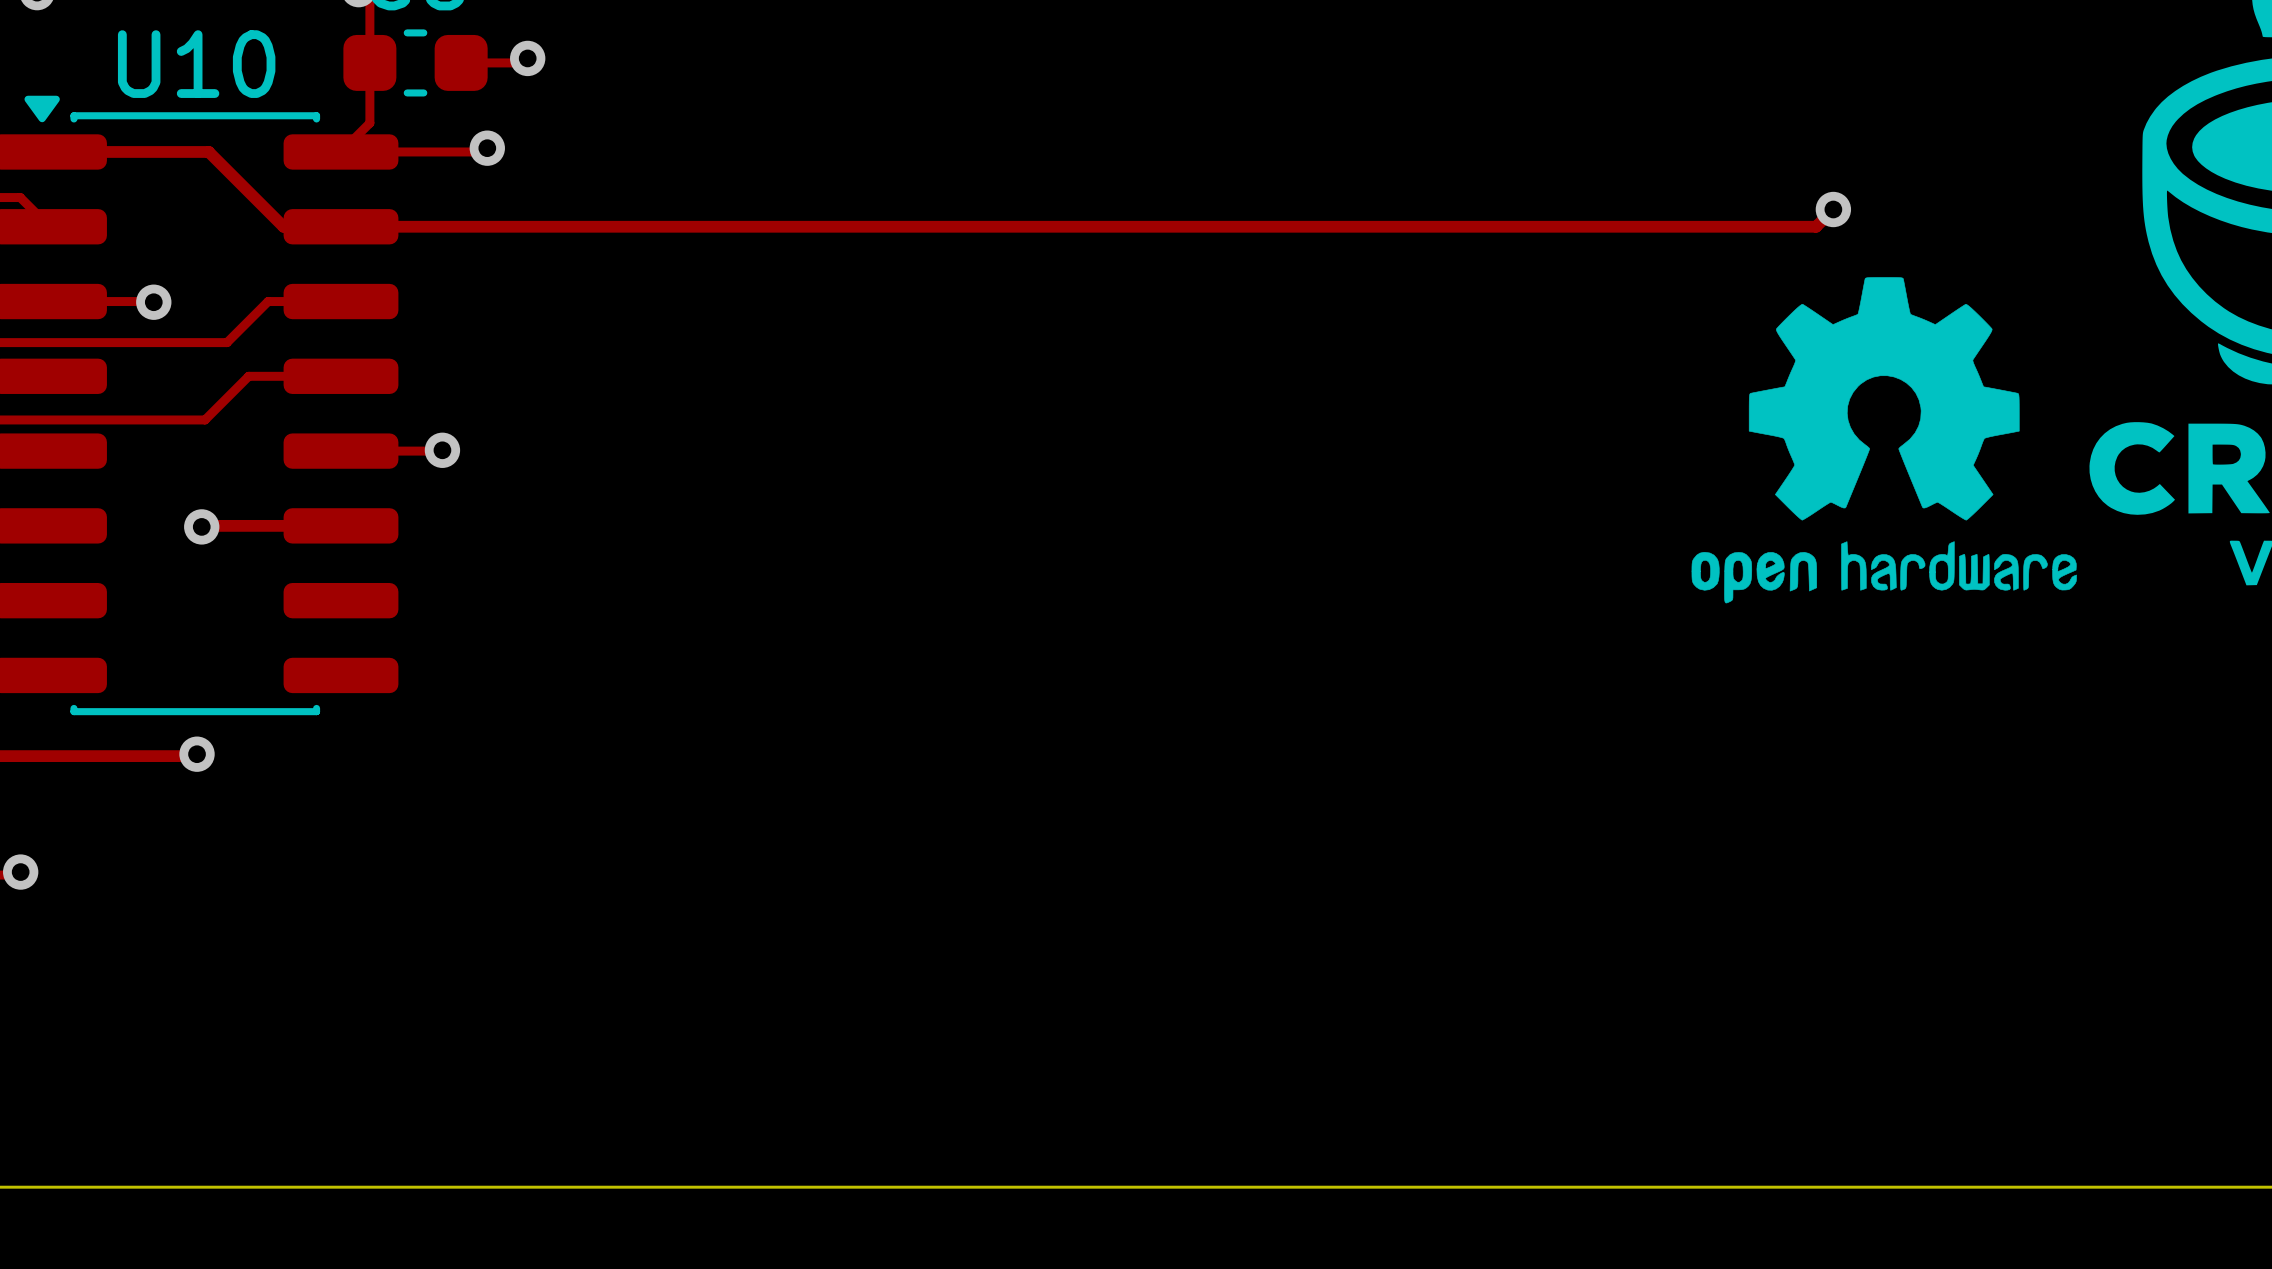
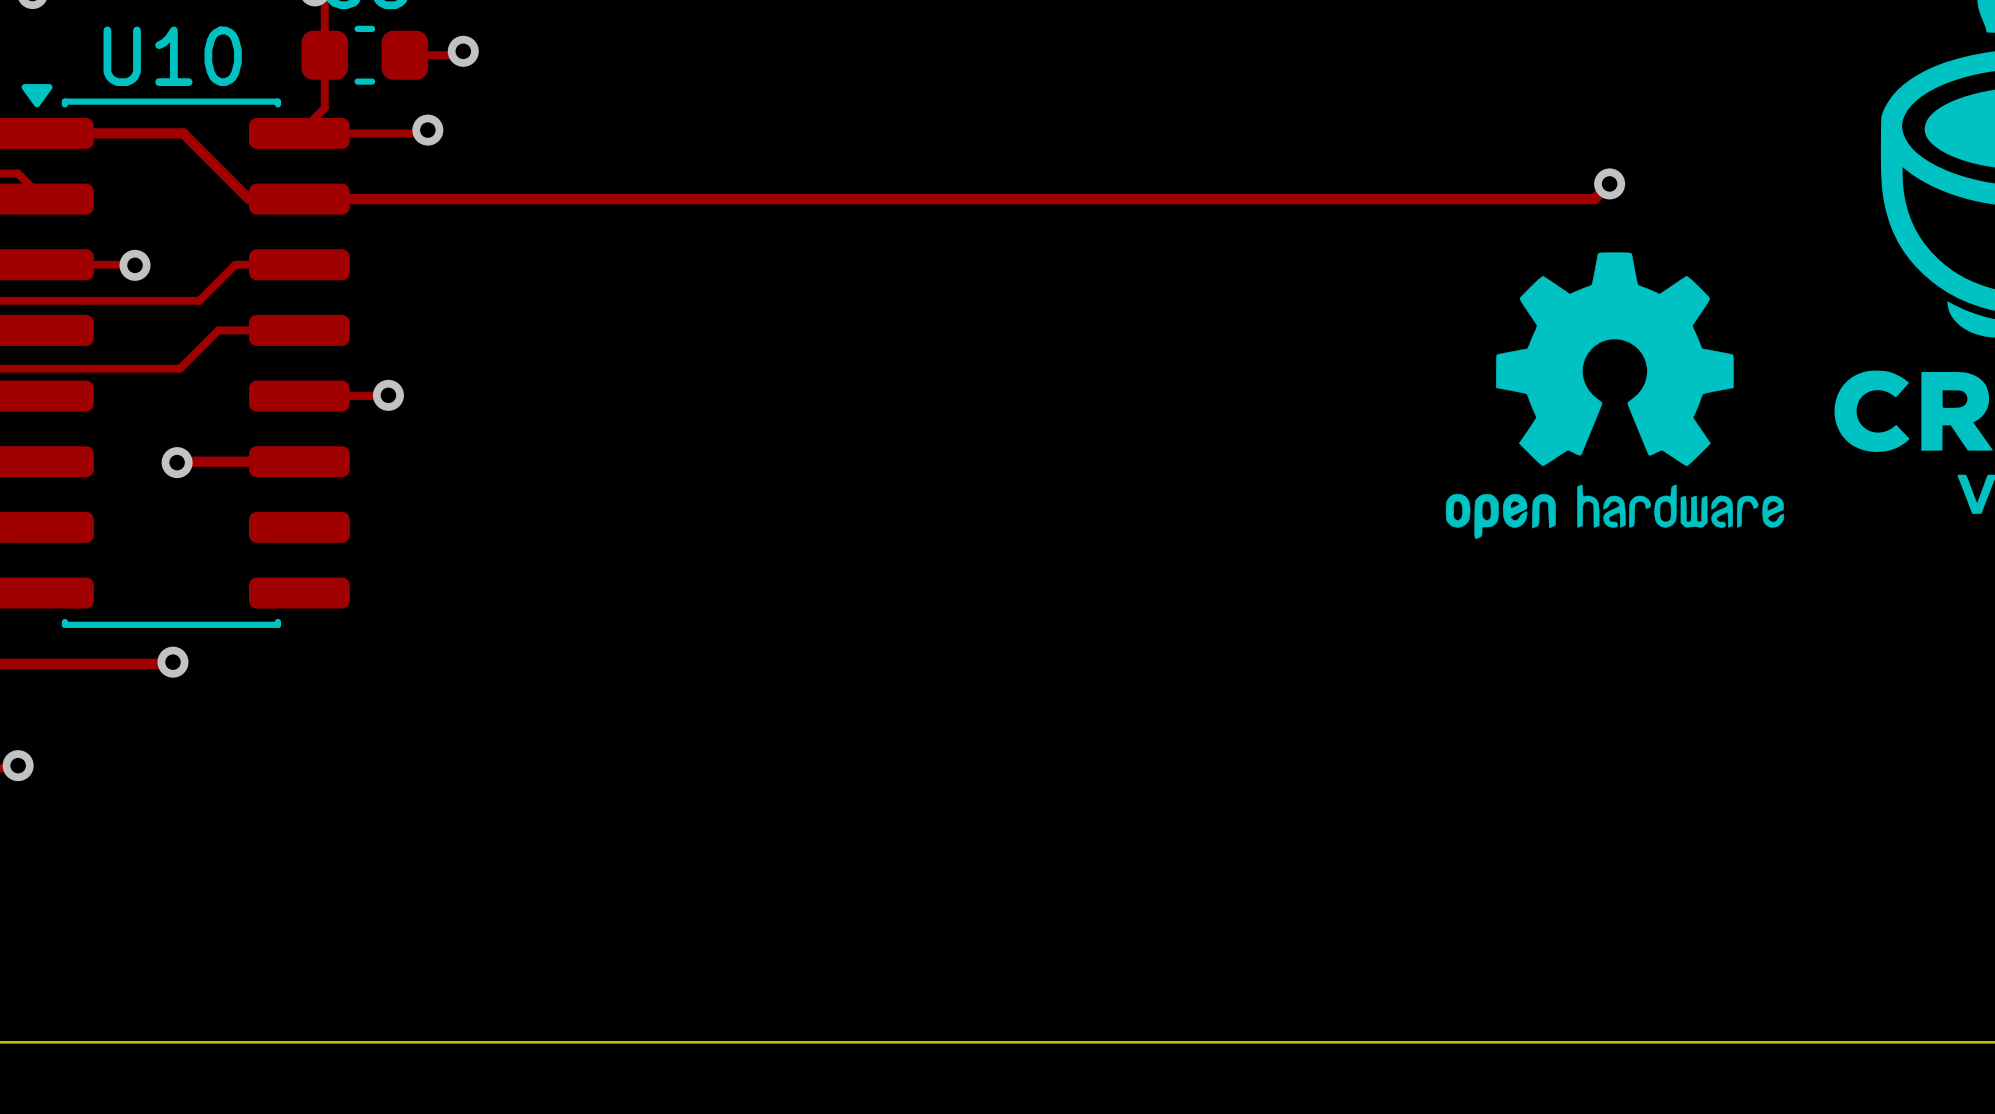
drawing position: (1884, 440) -> (1614, 395)

